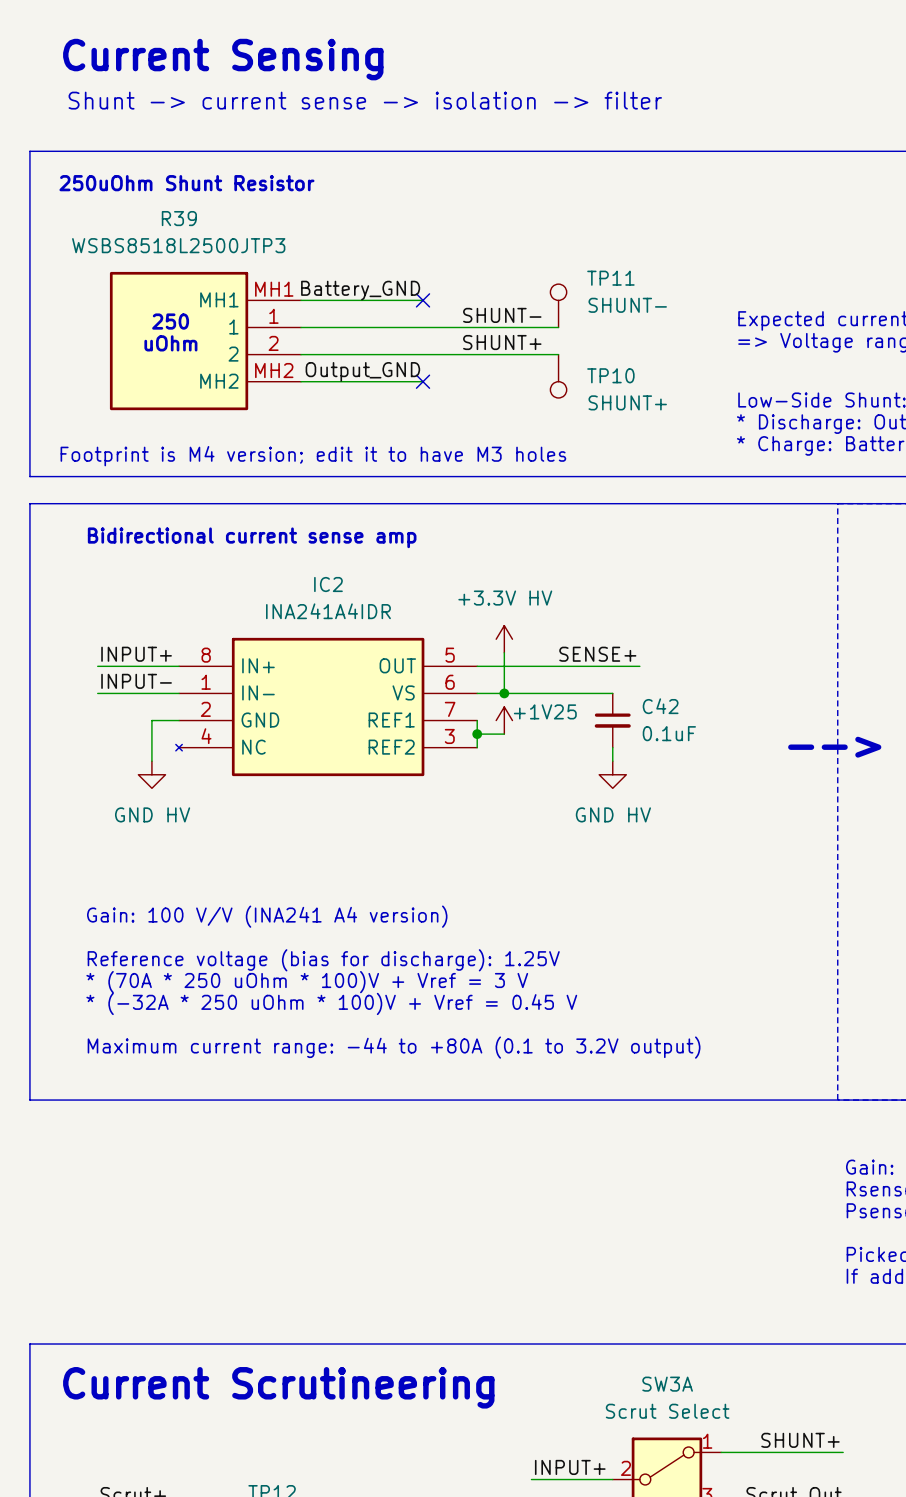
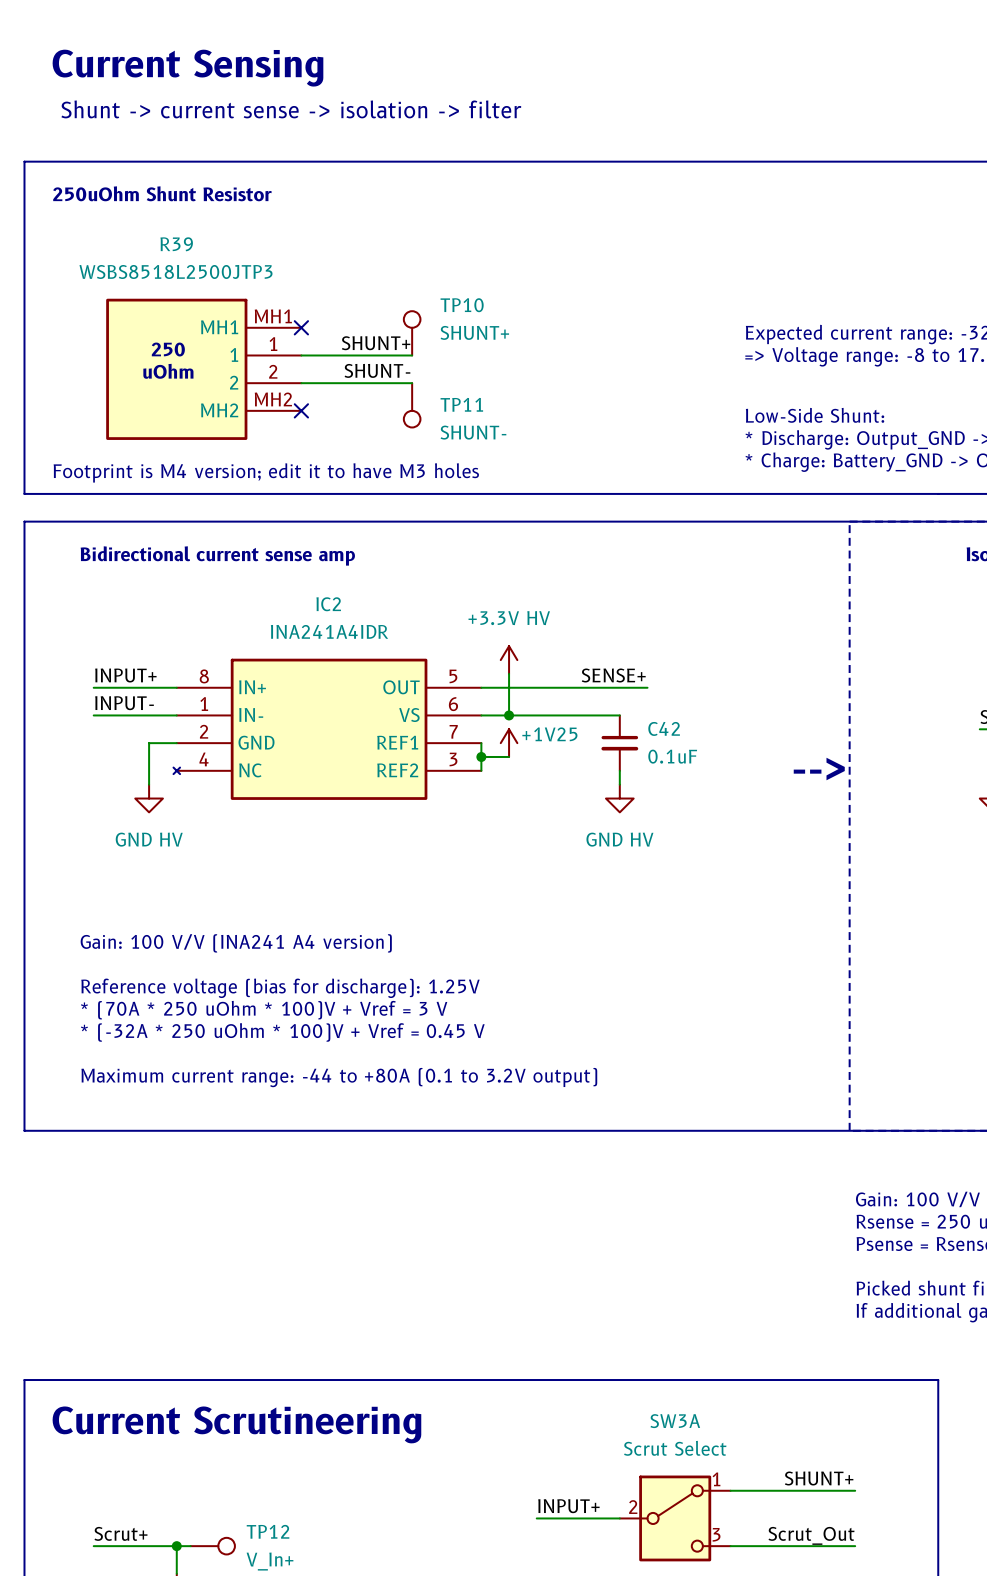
TP11 name position: TP11 (610, 278) -> TP11 (461, 404)
label: Battery_GND (360, 290) -> none
TP11 rotation: 0° (558, 292) -> 180° (412, 419)
wire: (301, 300) (423, 300) -> none
no-connect mark: (423, 300) -> none
TP11 position: (558, 305) -> (412, 405)
TP11 value position: SHUNT- (627, 305) -> SHUNT- (473, 432)
no-connect mark: none -> (301, 327)
label position: SHUNT- (502, 315) -> SHUNT- (377, 370)
text position: 250 (170, 321) -> 250 (168, 349)
wire: (301, 327) (558, 327) -> none
R39 position: (205, 341) -> (203, 369)
wire: none -> (301, 355) (412, 355)
label position: SHUNT+ (502, 342) -> SHUNT+ (376, 343)
text position: uOhm (170, 343) -> uOhm (168, 371)
wire: (301, 354) (558, 354) -> none
wire: none -> (301, 383) (412, 383)
label: Output_GND (362, 371) -> none
TP10 name position: TP10 (610, 375) -> TP10 (462, 305)
TP10 position: (558, 376) -> (412, 333)
wire: (301, 381) (423, 381) -> none
no-connect mark: (423, 381) -> none
TP10 rotation: 0° (558, 389) -> 180° (412, 319)
no-connect mark: none -> (301, 410)
TP10 value position: SHUNT+ (627, 402) -> SHUNT+ (474, 332)

